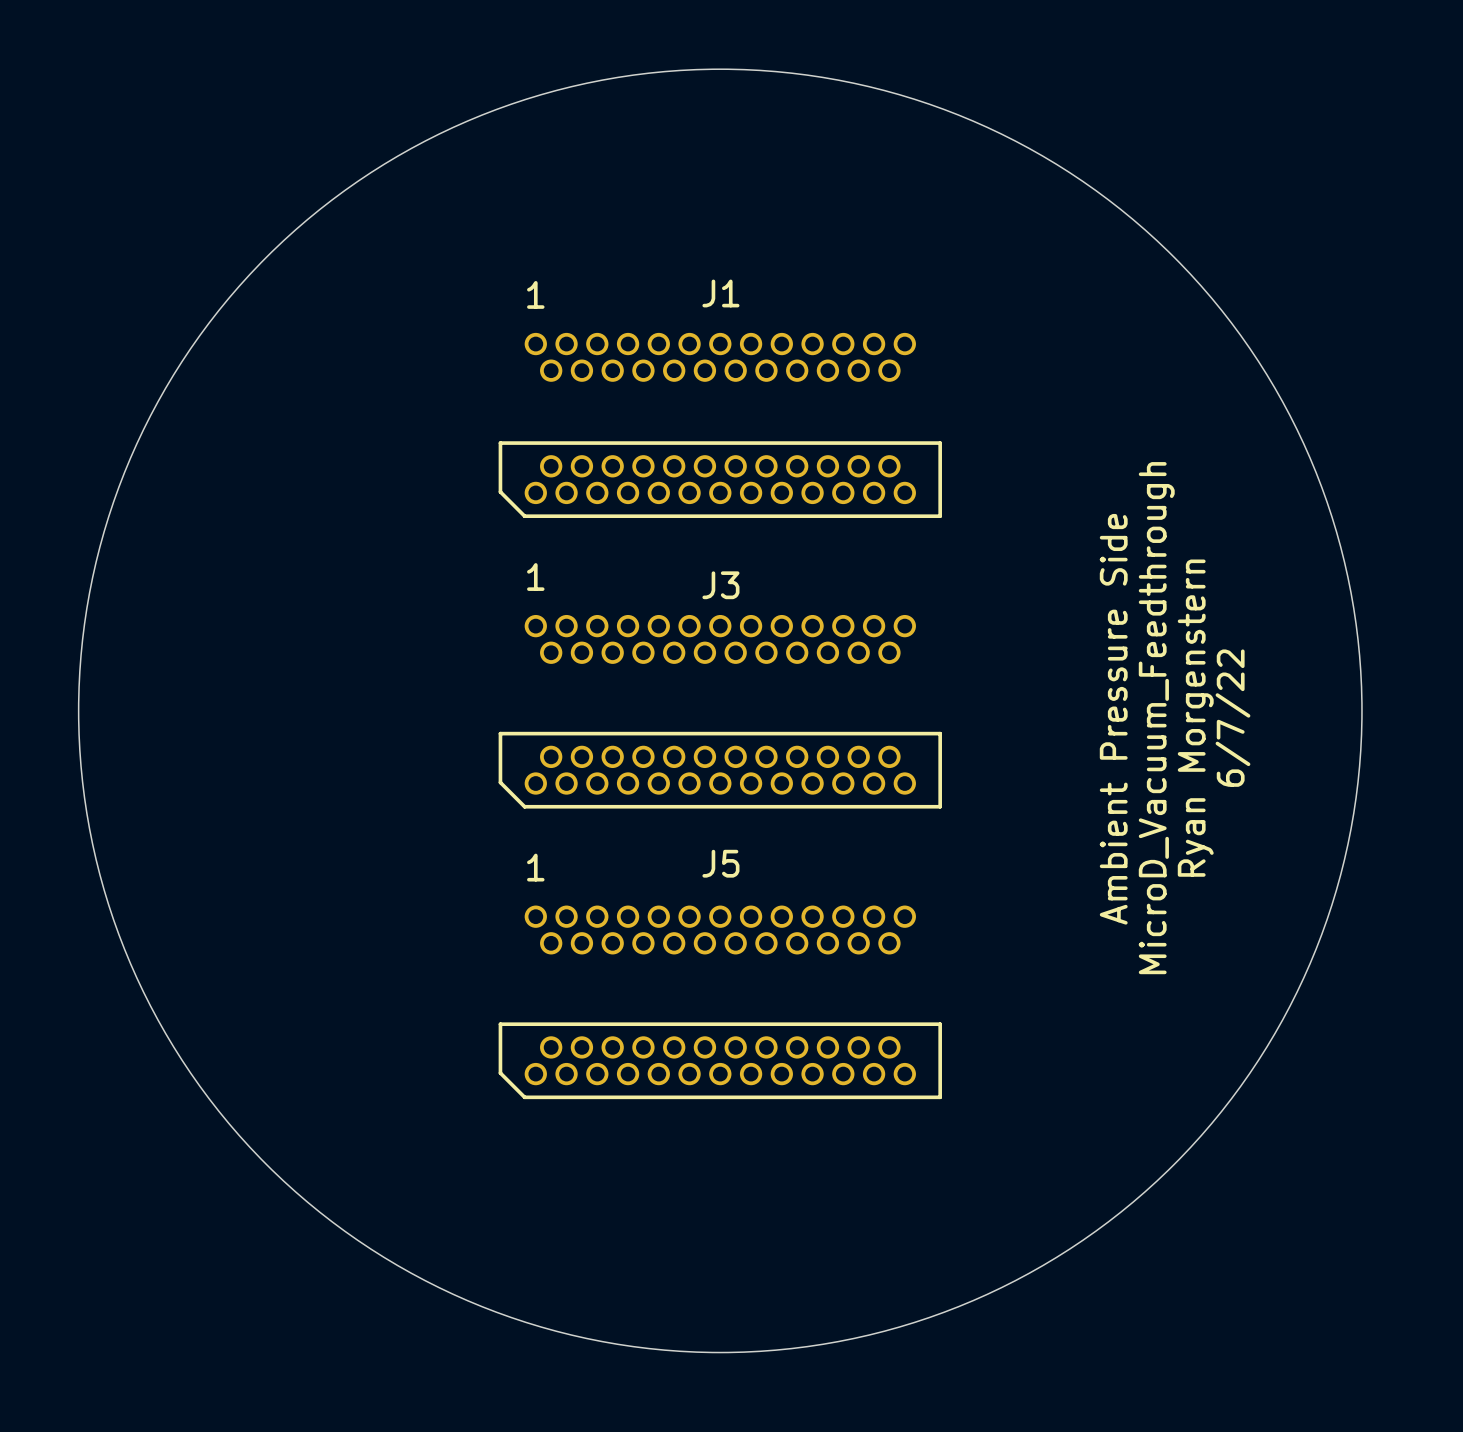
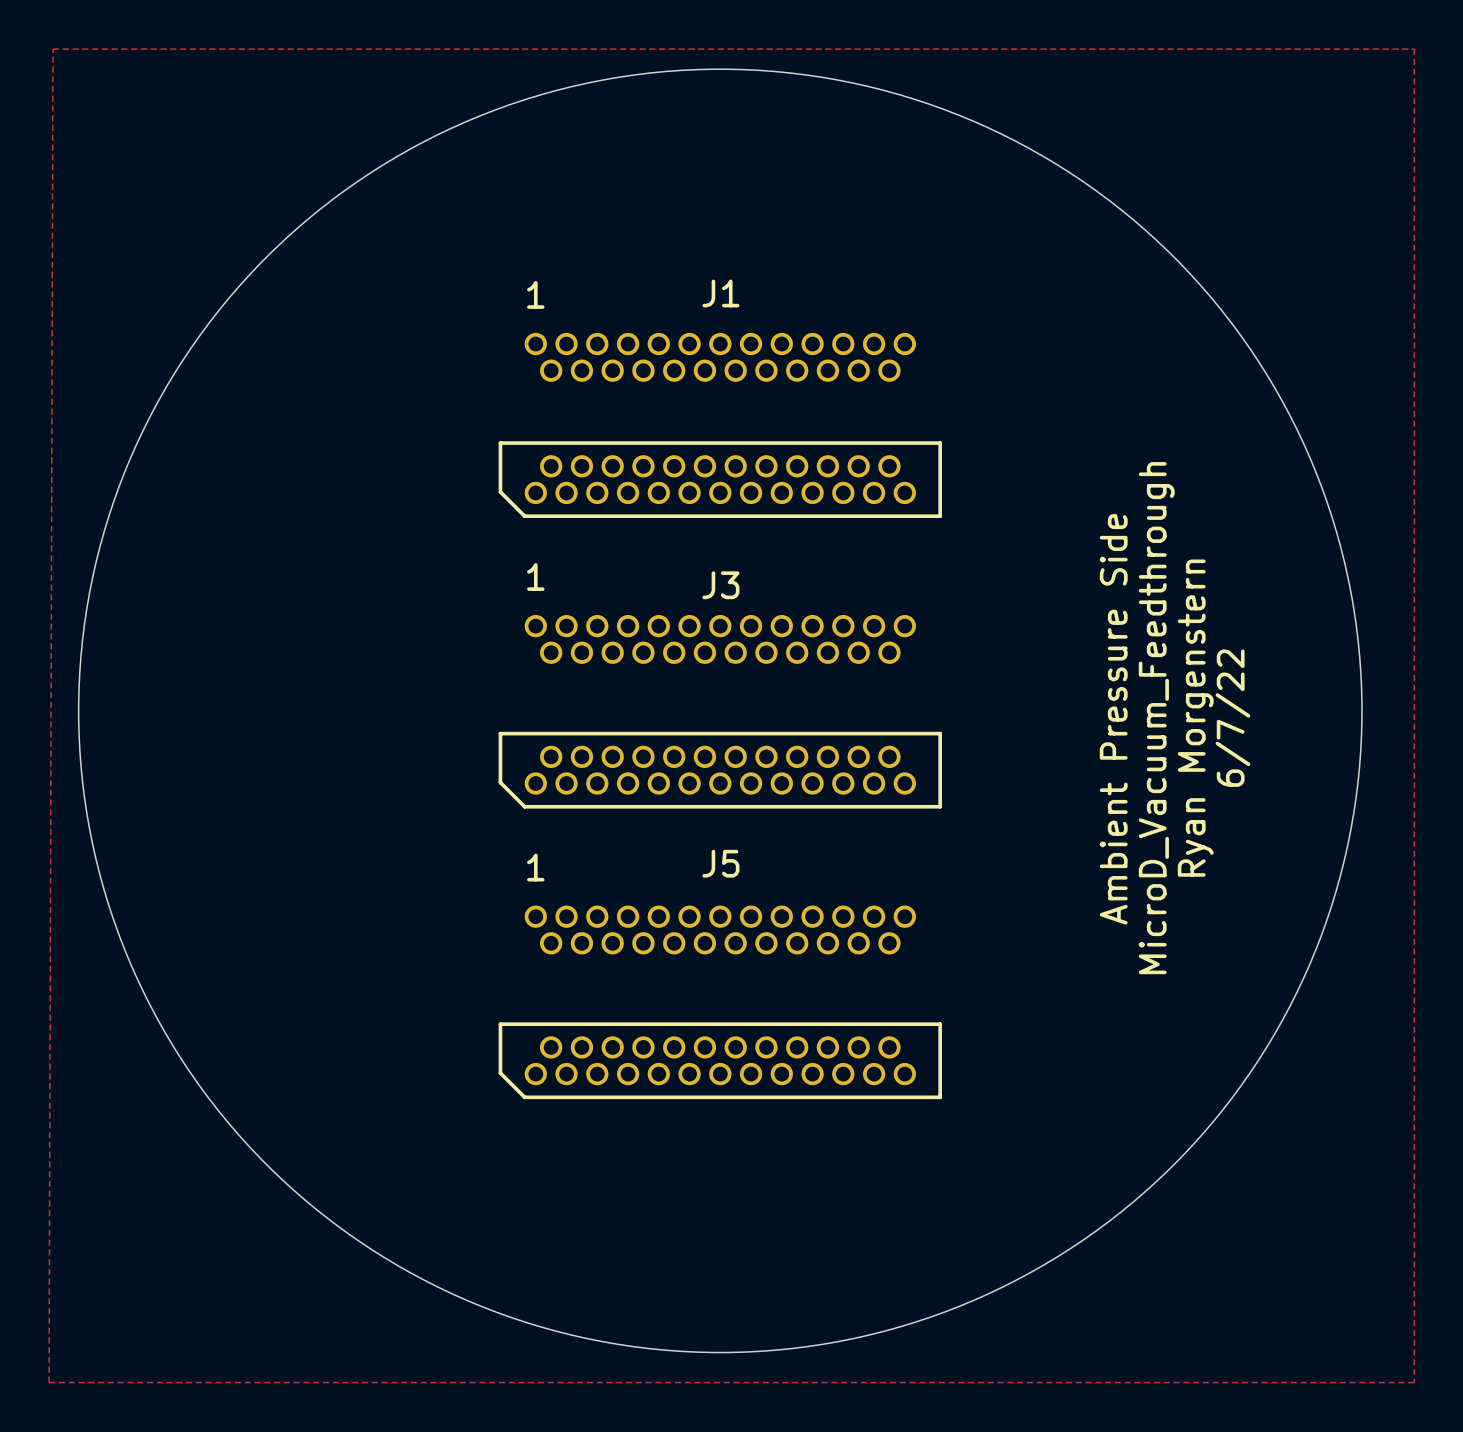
zone outline: none -> (52, 49) (49, 1382) (1414, 1382) (1414, 49) (52, 49)

